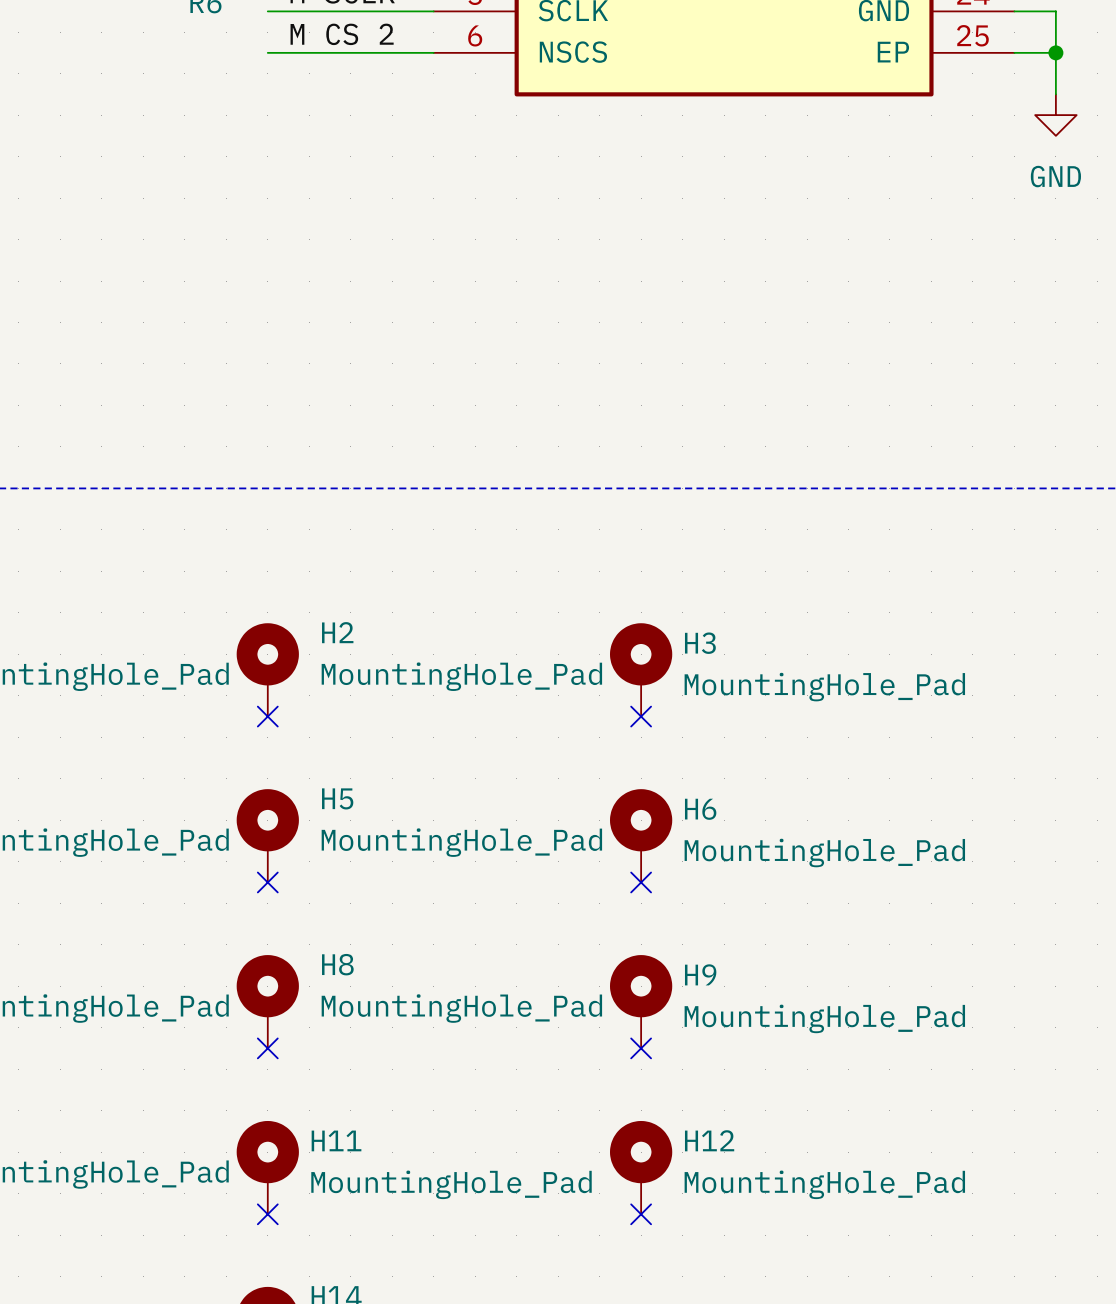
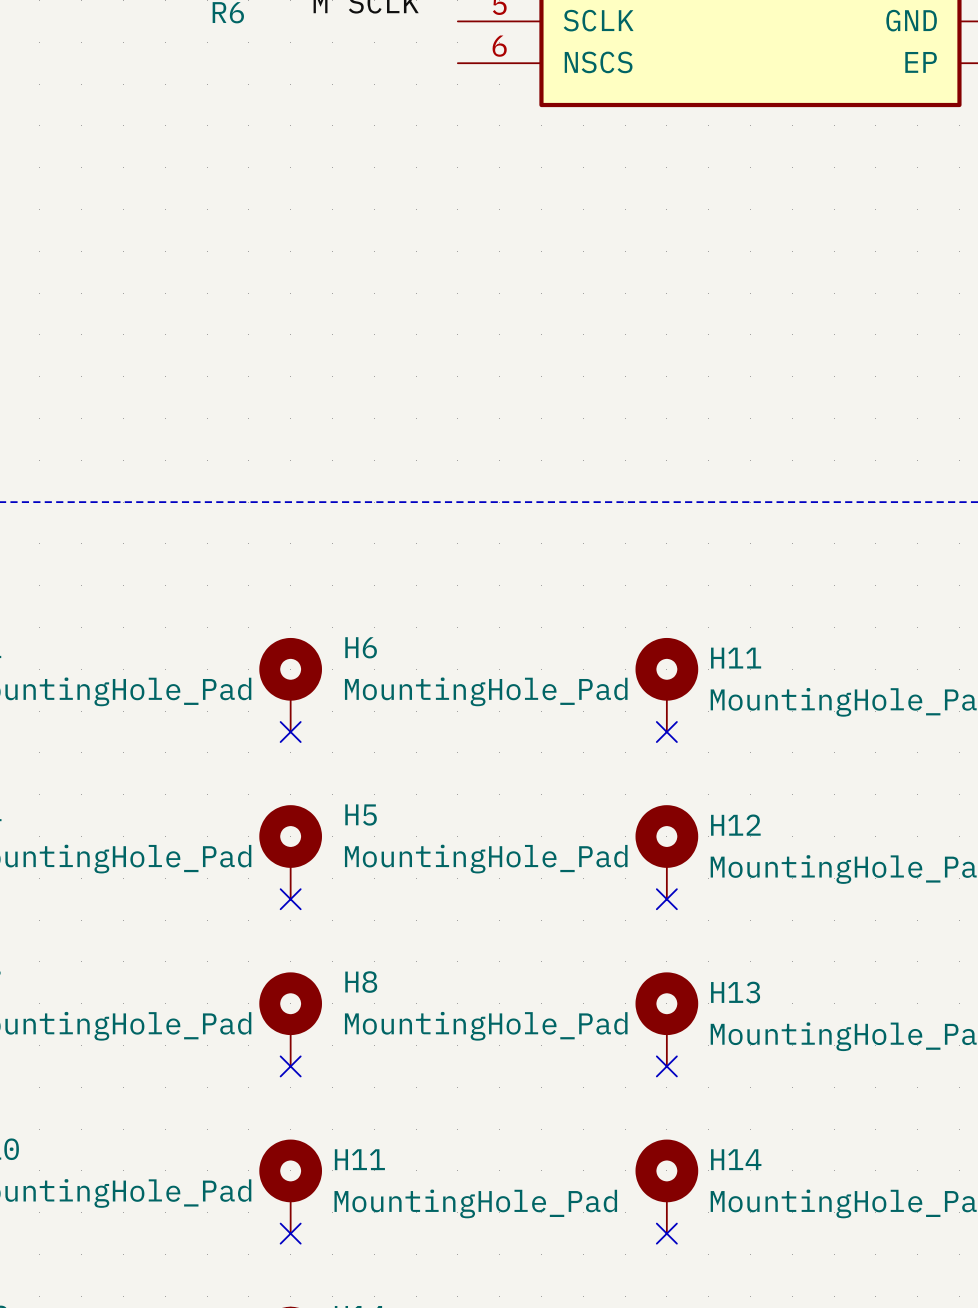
wire: (267, 11) (433, 11) -> none
label: M CS 2 (342, 34) -> none
wire: (267, 52) (433, 52) -> none
H2 name: H2 (337, 632) -> H6 (361, 647)
H3 name: H3 (700, 643) -> H11 (736, 658)
H6 name: H6 (700, 809) -> H12 (735, 825)
H9 name: H9 (700, 974) -> H13 (735, 992)
H12 name: H12 (709, 1140) -> H14 (736, 1159)

